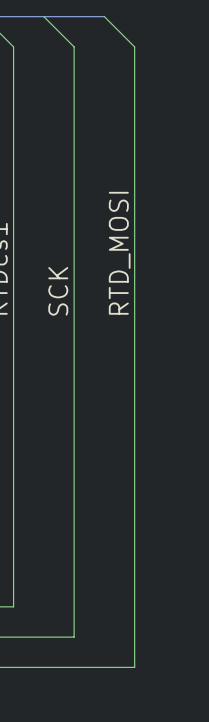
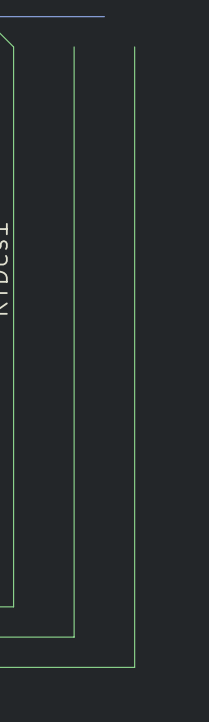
wire: (43, 16) (74, 46) -> none
wire: (104, 16) (134, 46) -> none
label: RTD_MOSI (119, 253) -> none
label: SCK (58, 291) -> none

